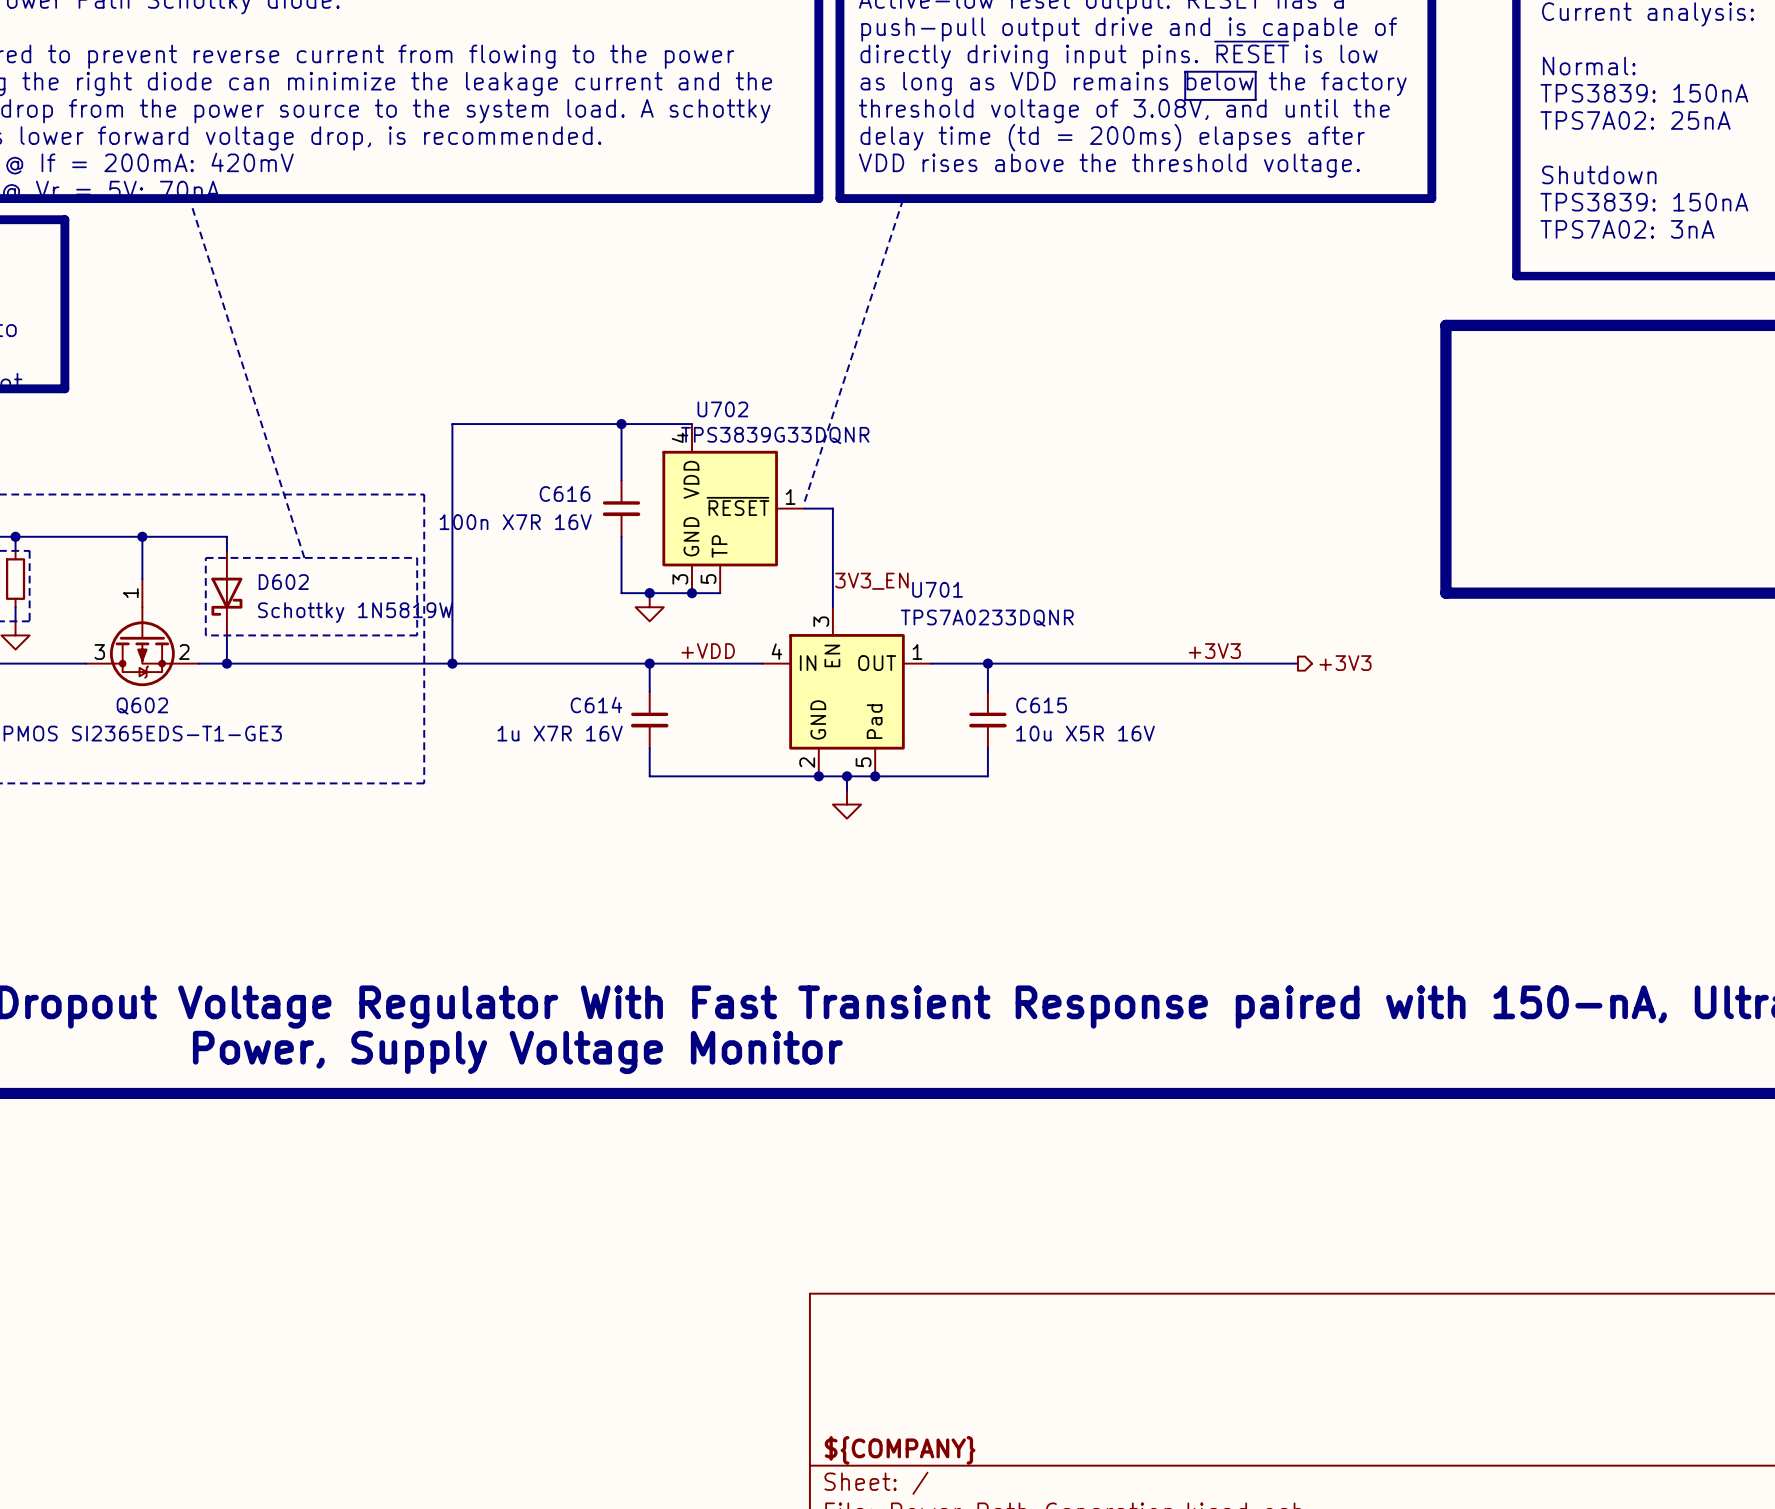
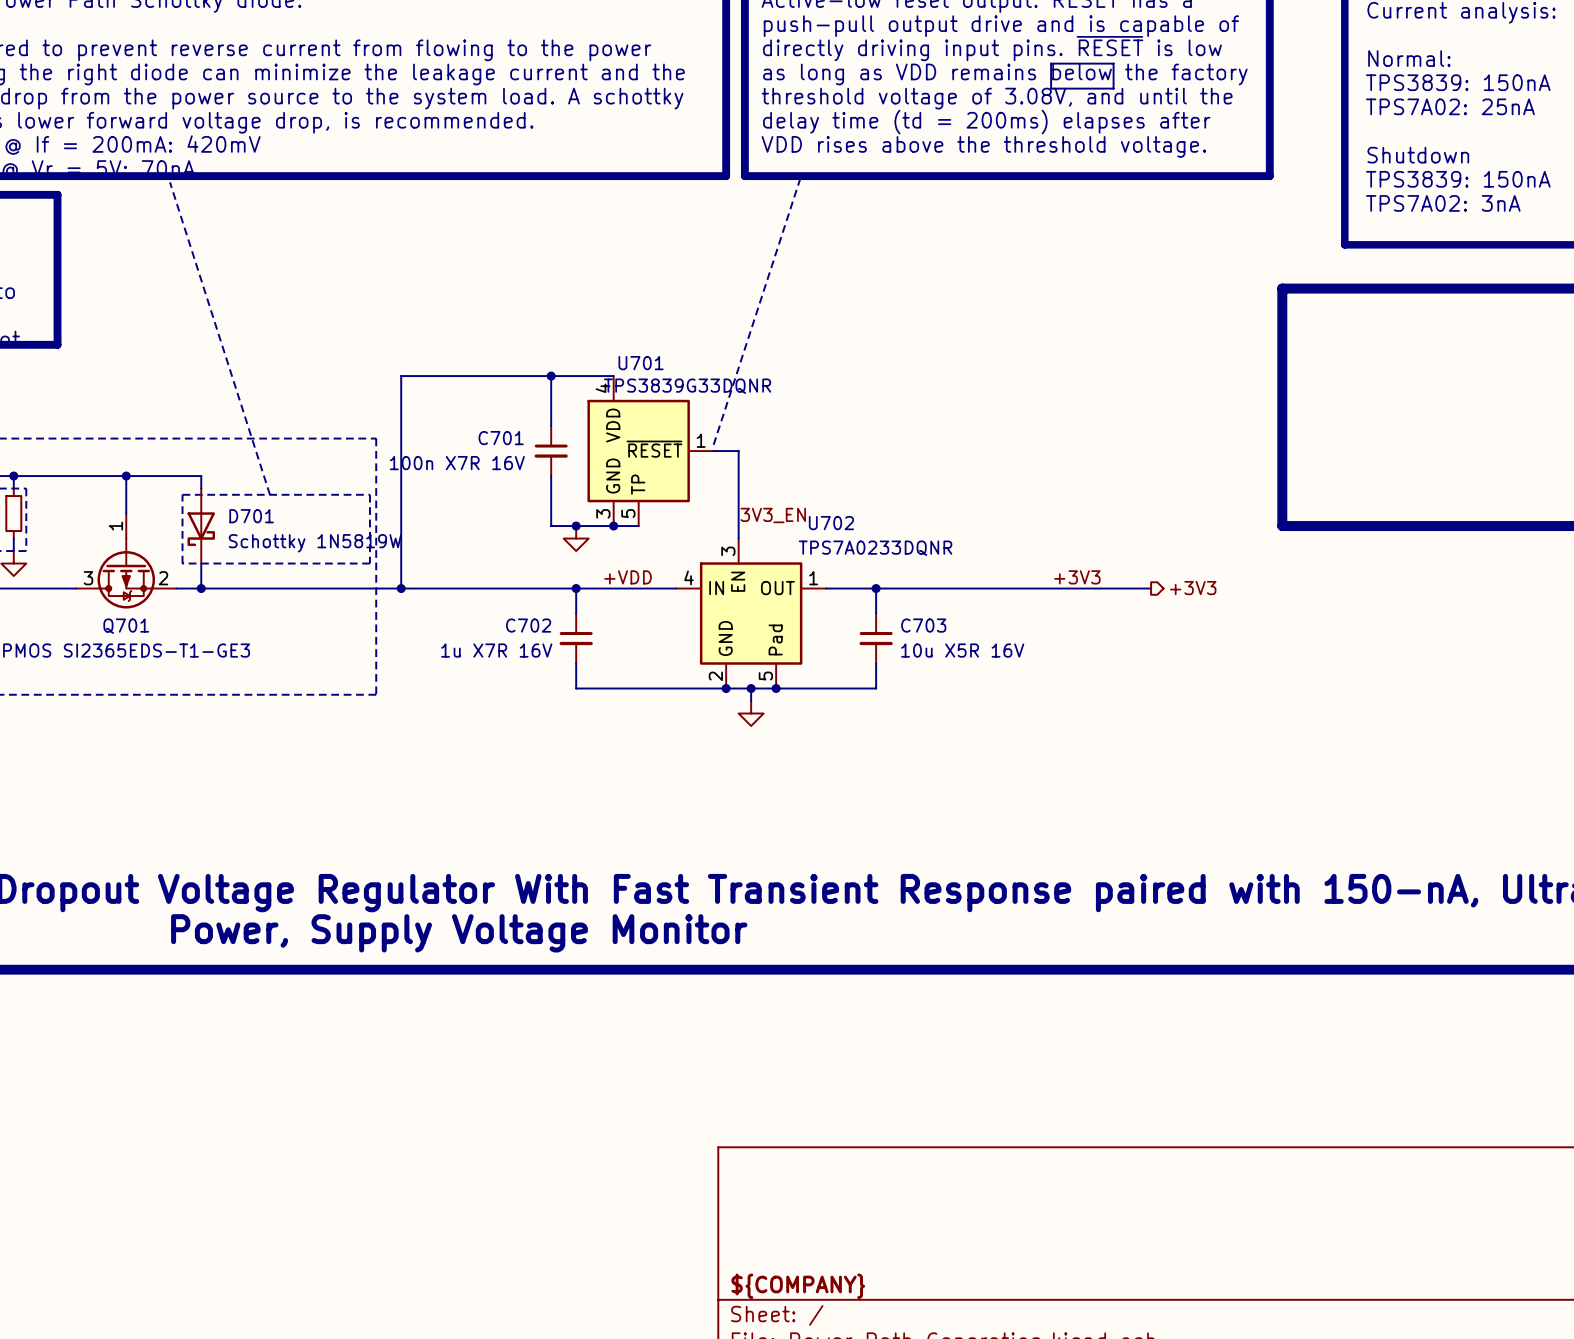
U702 name: U702 (722, 409) -> U701 (641, 363)
C616 name: C616 (565, 493) -> C701 (501, 438)
D602 name: D602 (283, 582) -> D701 (251, 516)
U701 name: U701 (937, 589) -> U702 (831, 523)
C614 name: C614 (596, 705) -> C702 (528, 625)
C615 name: C615 (1041, 705) -> C703 (923, 625)
Q602 name: Q602 (142, 706) -> Q701 (126, 626)

